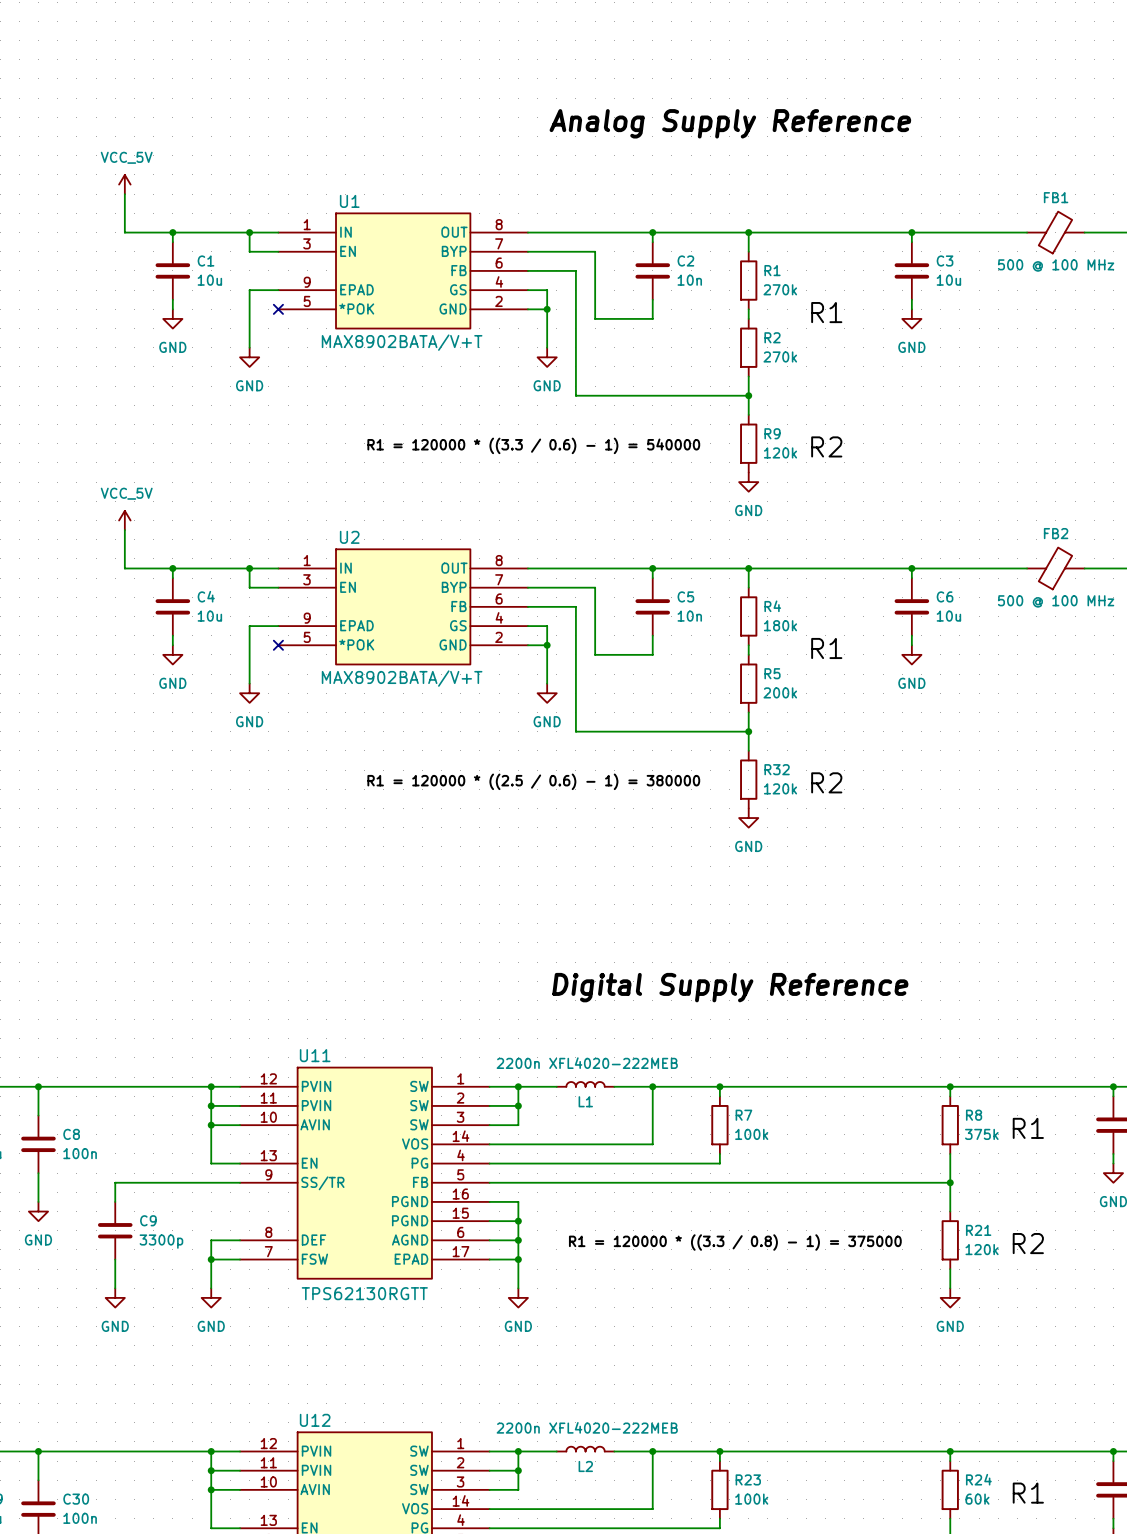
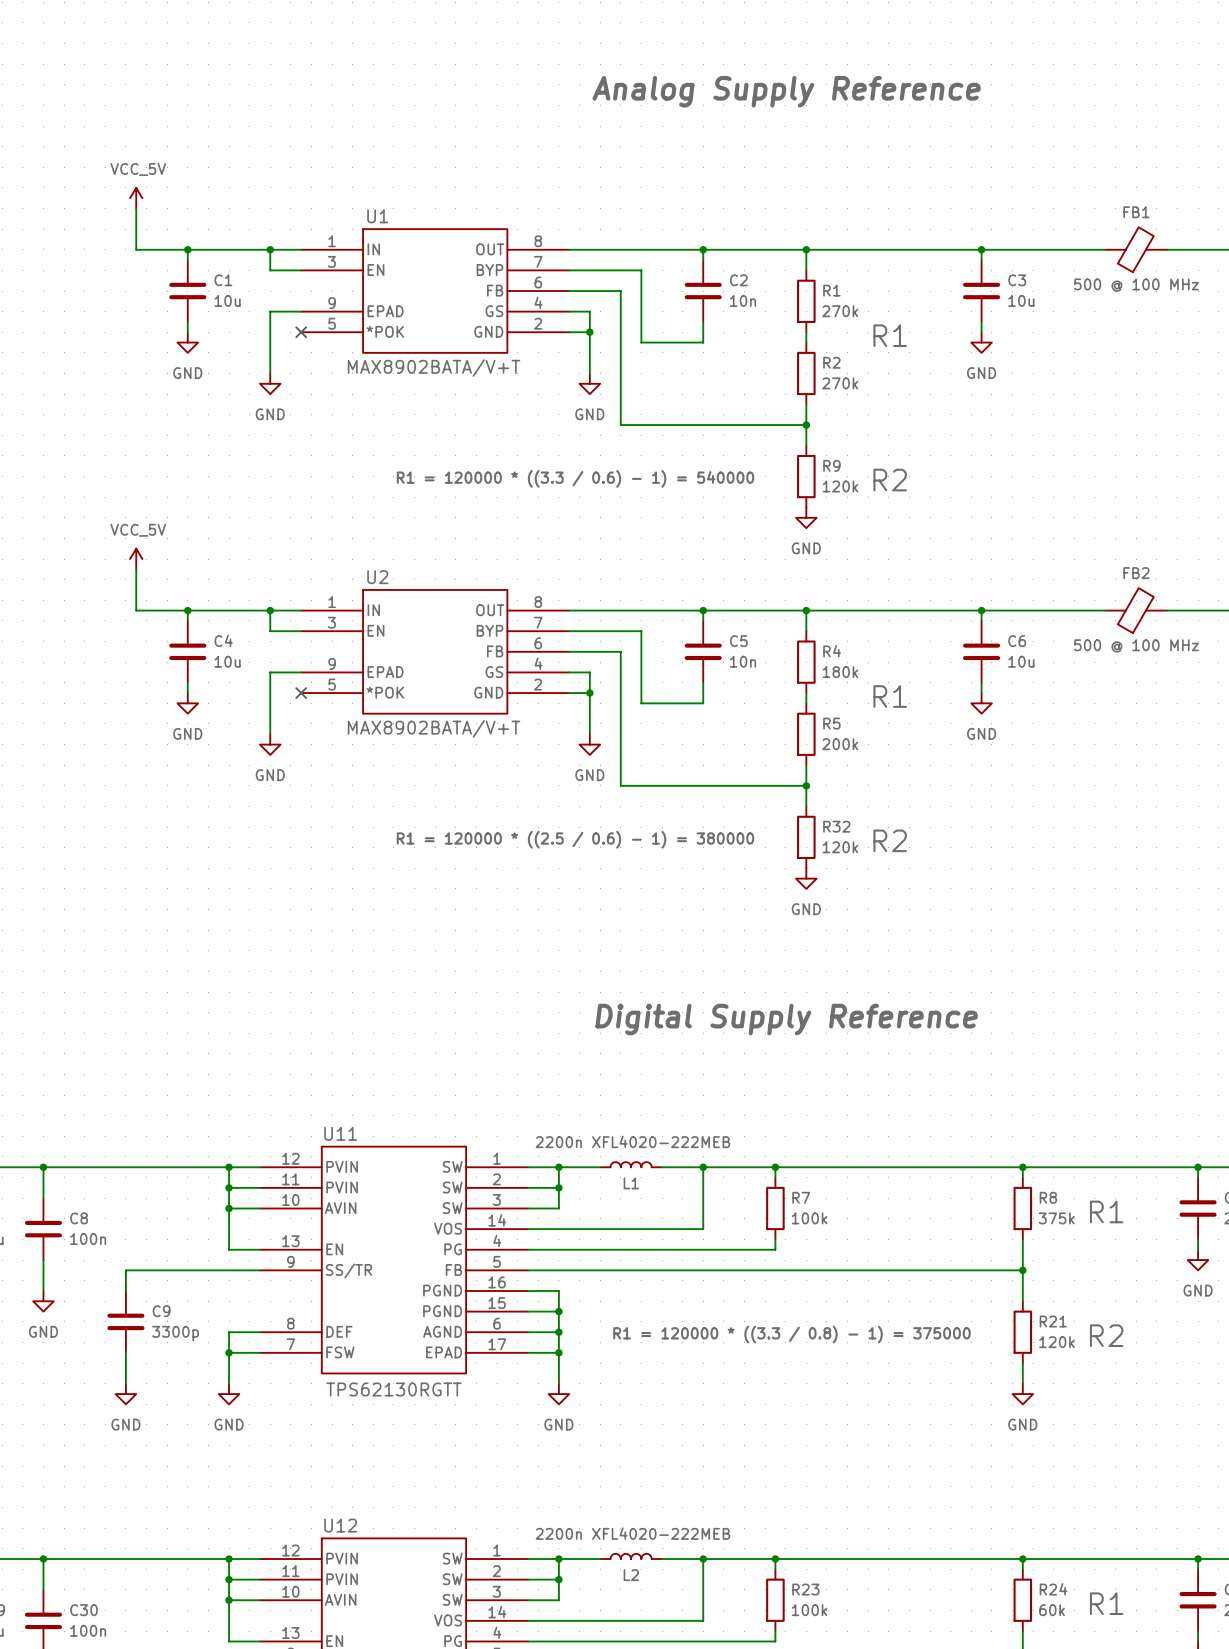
label position: Analog Supply Reference (730, 123) -> Analog Supply Reference (786, 91)
label position: Digital Supply Reference (730, 987) -> Digital Supply Reference (786, 1019)

